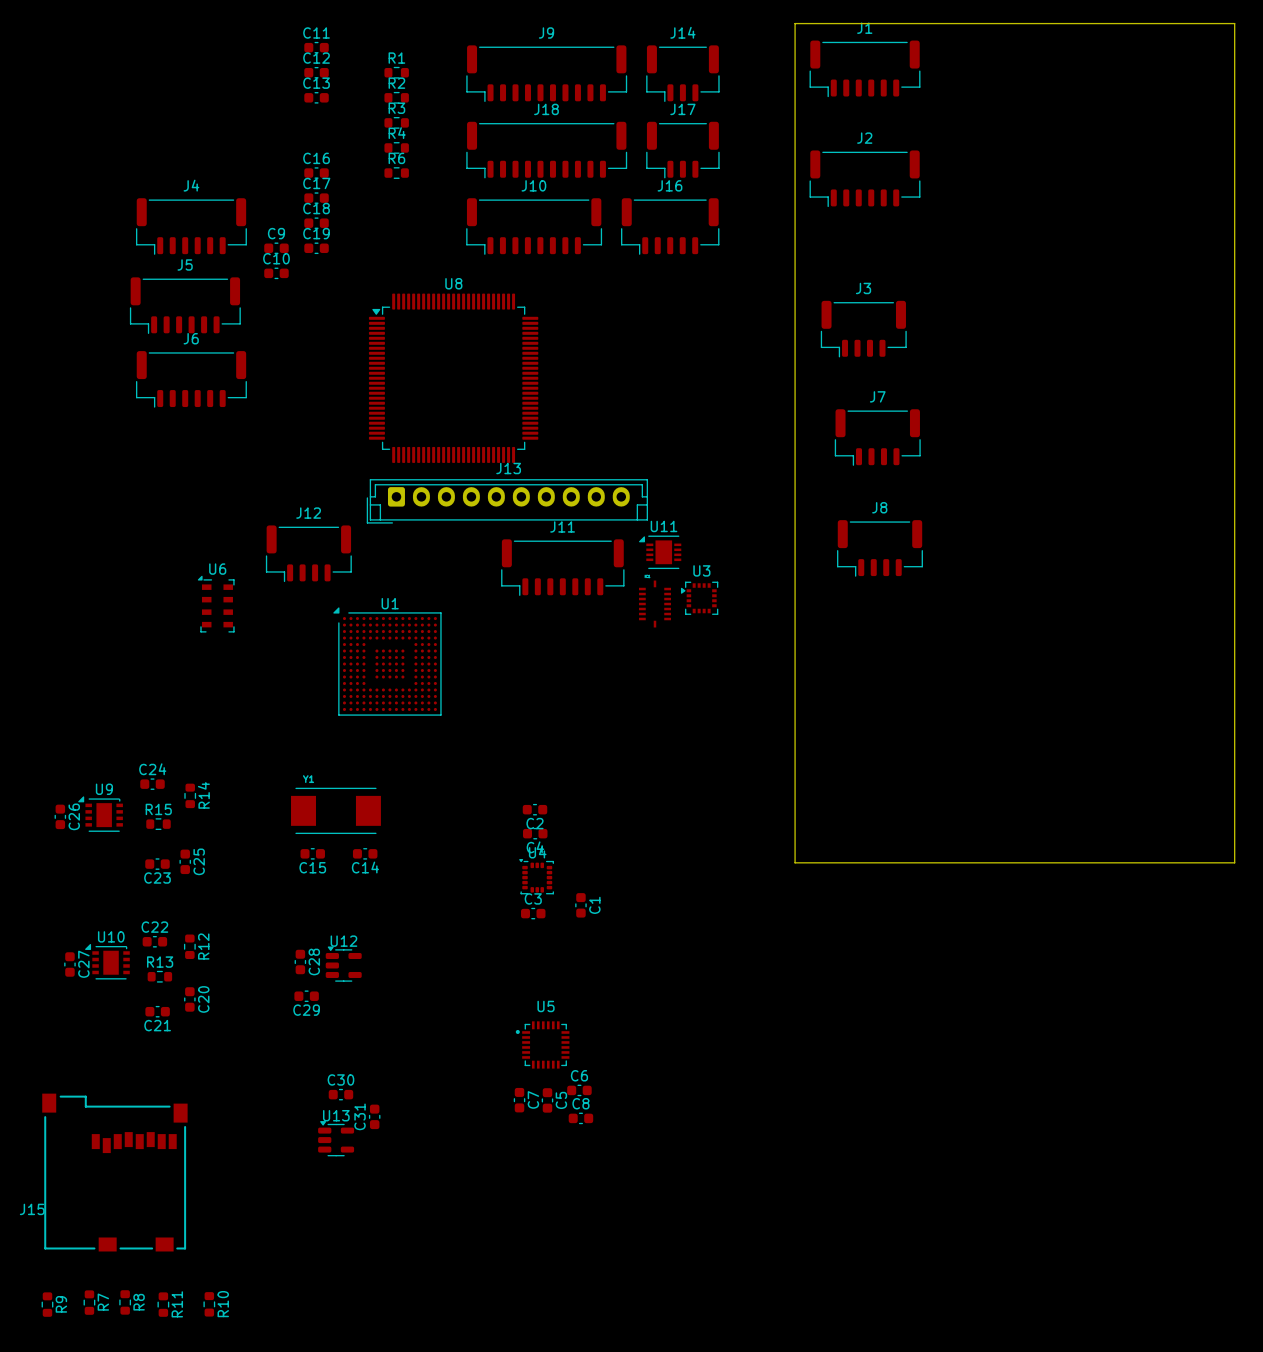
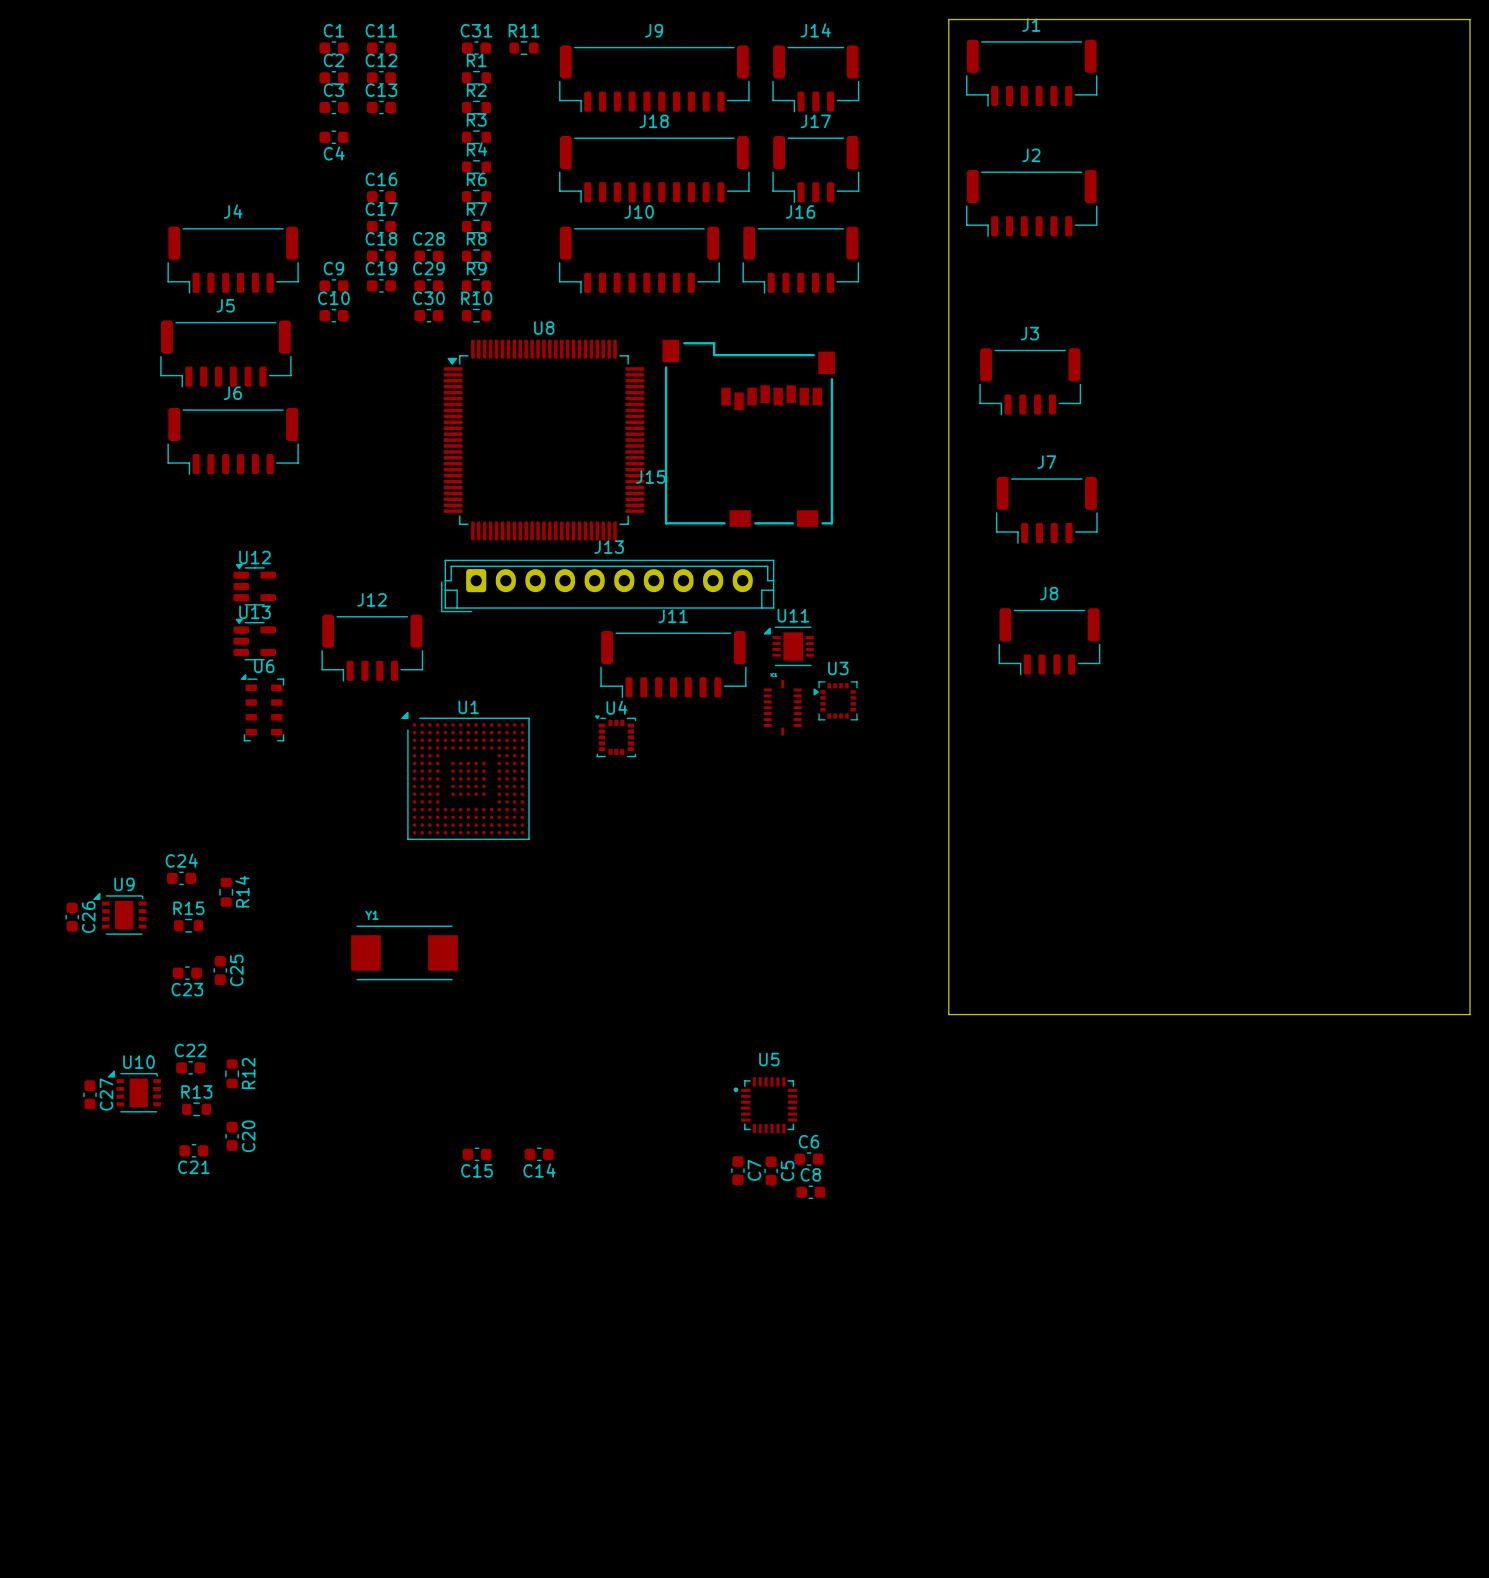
C24 position: (152, 784) -> (181, 878)
R14 position: (190, 795) -> (226, 892)
C2 position: (534, 809) -> (333, 77)
U9 position: (100, 814) -> (119, 913)
C26 position: (60, 816) -> (72, 917)
C2 name position: C2 (534, 823) -> C2 (333, 60)
R15 position: (158, 824) -> (188, 925)
C4 position: (535, 833) -> (333, 137)
C15 position: (312, 853) -> (477, 1154)
C14 position: (365, 853) -> (539, 1154)
C25 position: (185, 861) -> (220, 970)
C23 position: (157, 864) -> (187, 973)
U4 position: (536, 876) -> (615, 736)
C1 rotation: 0° (580, 905) -> 90° clockwise (333, 48)
C1 position: (580, 905) -> (333, 48)
C1 name position: C1 (594, 905) -> C1 (333, 30)
C3 position: (533, 913) -> (333, 107)
C22 position: (154, 941) -> (190, 1067)
R12 position: (189, 946) -> (232, 1073)
U10 position: (107, 961) -> (134, 1091)
C28 rotation: 0° (300, 961) -> 90° clockwise (428, 256)
C28 position: (300, 961) -> (428, 256)
C28 name position: C28 (314, 961) -> C28 (428, 238)
C27 position: (69, 964) -> (89, 1094)
U12 position: (343, 964) -> (254, 584)
R13 position: (159, 976) -> (196, 1109)
C29 position: (306, 996) -> (428, 285)
C20 position: (189, 999) -> (232, 1136)
C29 name position: C29 (306, 1010) -> C29 (428, 268)
C21 position: (157, 1011) -> (193, 1150)
U5 position: (542, 1044) -> (765, 1105)
C6 position: (579, 1090) -> (809, 1159)
C30 position: (340, 1094) -> (428, 315)
C7 position: (519, 1100) -> (737, 1170)
C5 position: (547, 1100) -> (771, 1170)
C31 rotation: 0° (374, 1116) -> 90° clockwise (476, 48)
C31 position: (374, 1116) -> (476, 48)
C8 position: (580, 1118) -> (810, 1192)
U13 position: (336, 1138) -> (254, 639)
J15 position: (114, 1172) -> (748, 433)
R7 rotation: 0° (89, 1302) -> 90° clockwise (476, 226)
R7 position: (89, 1302) -> (476, 226)
R7 name position: R7 (103, 1302) -> R7 (477, 209)
R8 rotation: 0° (125, 1302) -> 90° clockwise (476, 256)
R8 position: (125, 1302) -> (476, 256)
R8 name position: R8 (139, 1302) -> R8 (476, 238)
R9 rotation: 0° (47, 1304) -> 90° clockwise (476, 285)
R9 position: (47, 1304) -> (476, 285)
R9 name position: R9 (61, 1304) -> R9 (476, 268)
R11 rotation: 0° (163, 1304) -> 90° clockwise (523, 48)
R11 position: (163, 1304) -> (523, 48)
R11 name position: R11 (177, 1304) -> R11 (524, 30)
R10 rotation: 0° (209, 1304) -> 90° clockwise (476, 315)
R10 position: (209, 1304) -> (476, 315)
R10 name position: R10 (223, 1304) -> R10 (476, 298)

